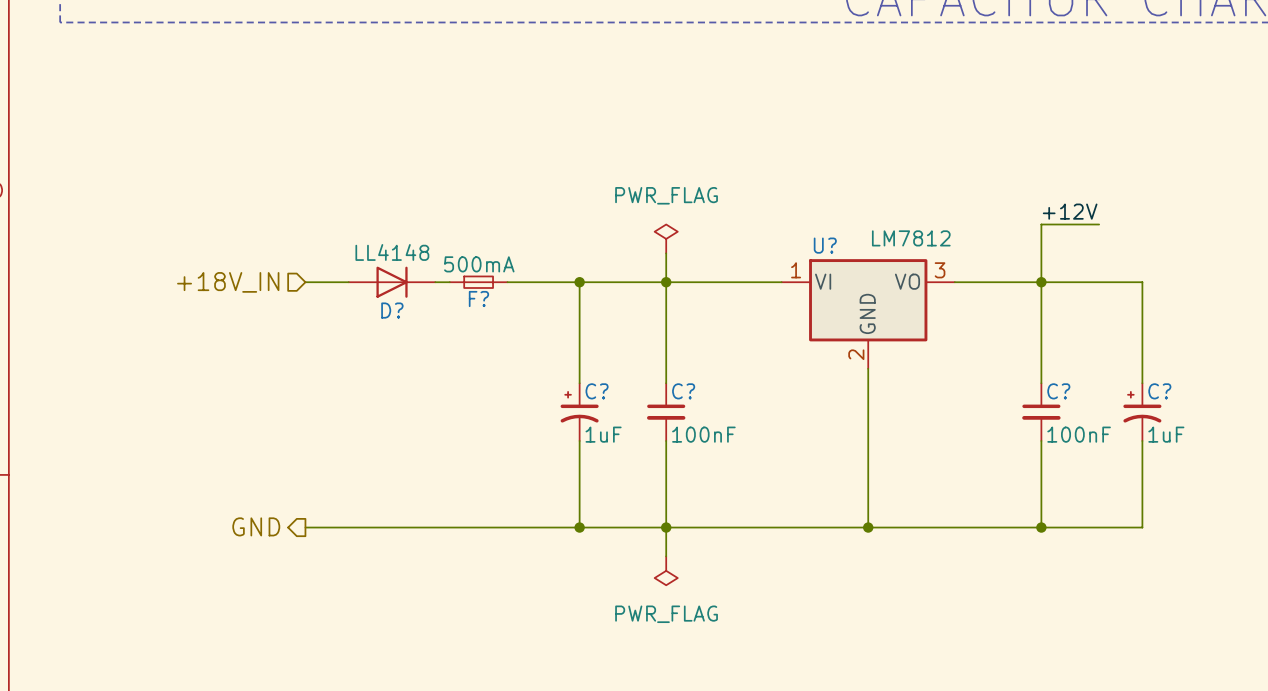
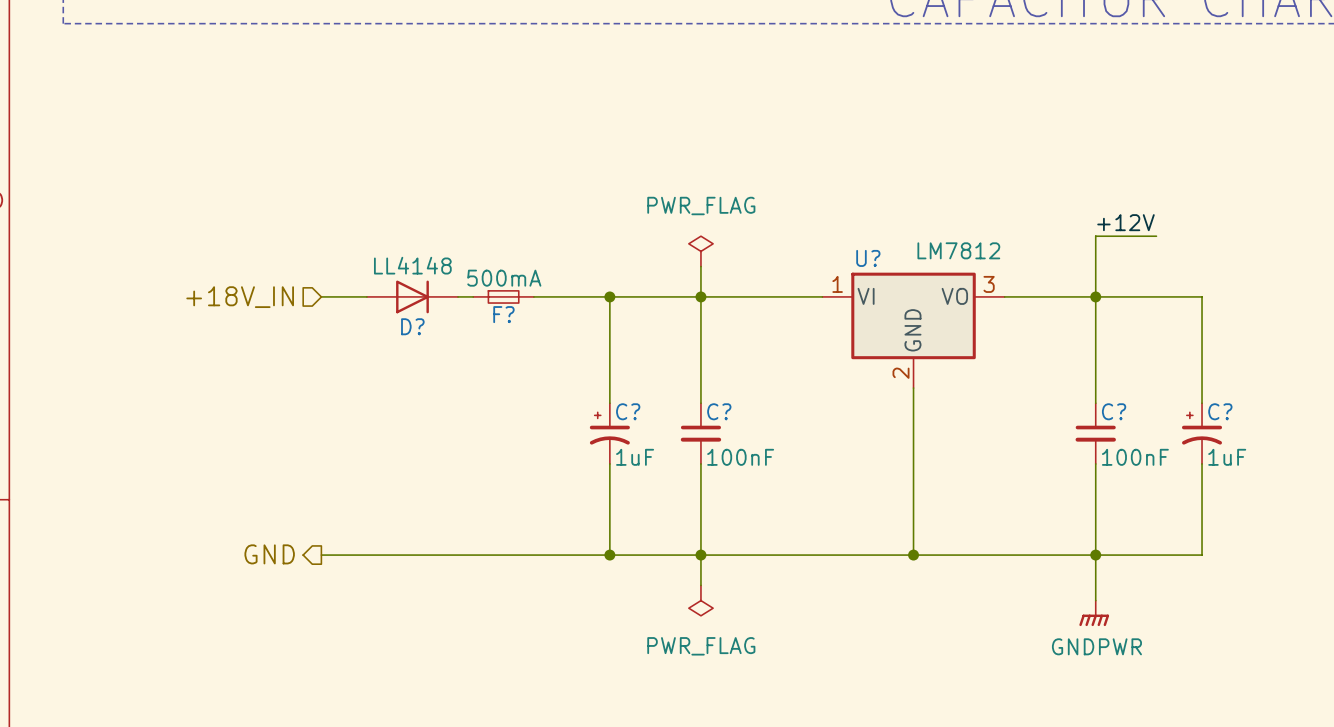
wire: none -> (1095, 555) (1095, 600)
power symbol: none -> GNDPWR (1094, 613)

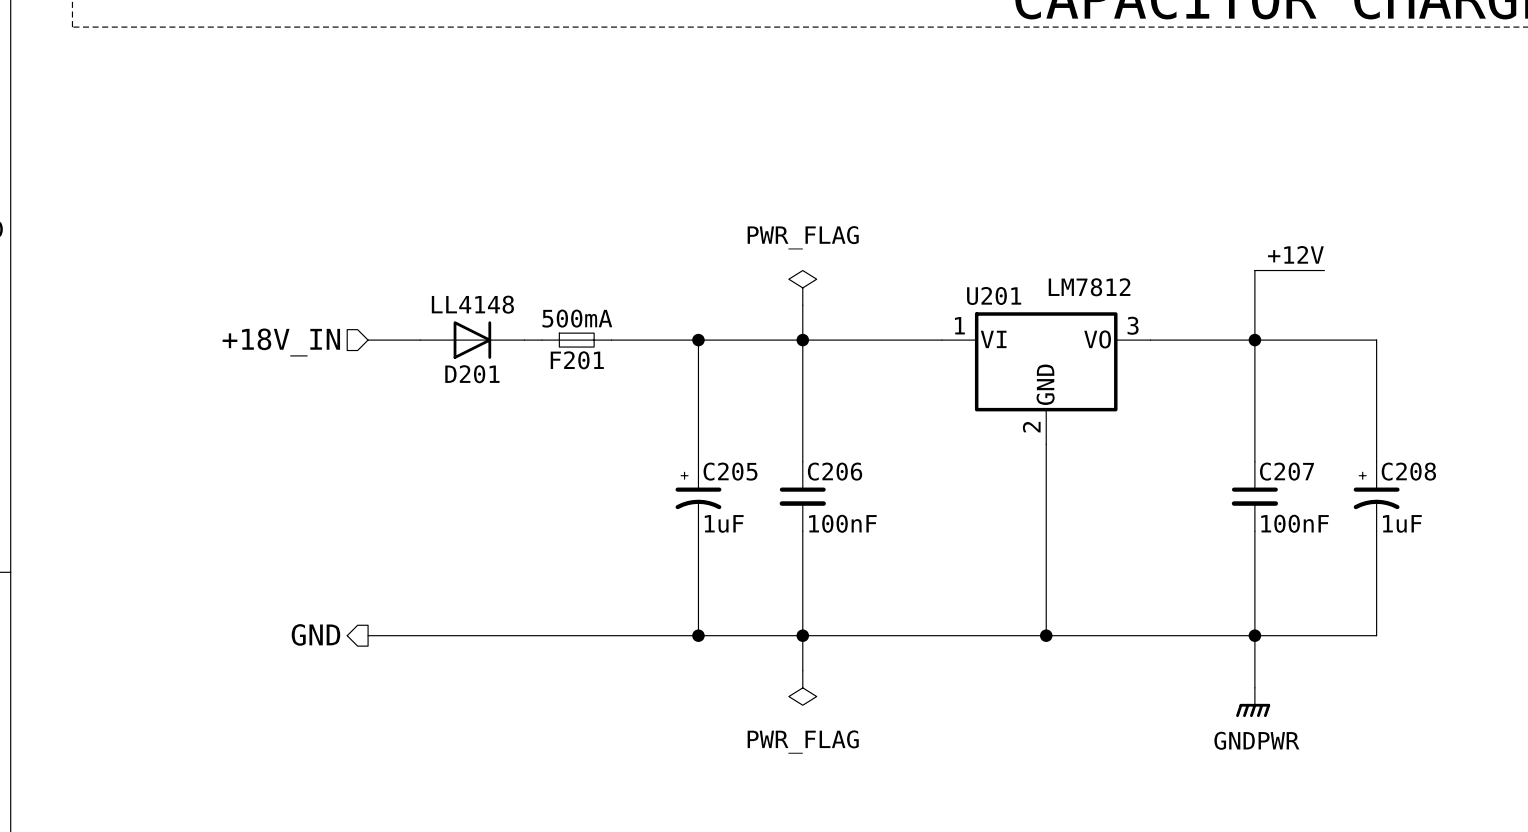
U? name: U? (868, 258) -> U201 (994, 295)
F? name: F? (503, 314) -> F201 (577, 360)
D? name: D? (412, 326) -> D201 (472, 374)
C? name: C? (628, 411) -> C205 (730, 471)
C? name: C? (719, 411) -> C206 (835, 471)
C? name: C? (1114, 411) -> C207 (1287, 471)
C? name: C? (1220, 411) -> C208 (1408, 471)

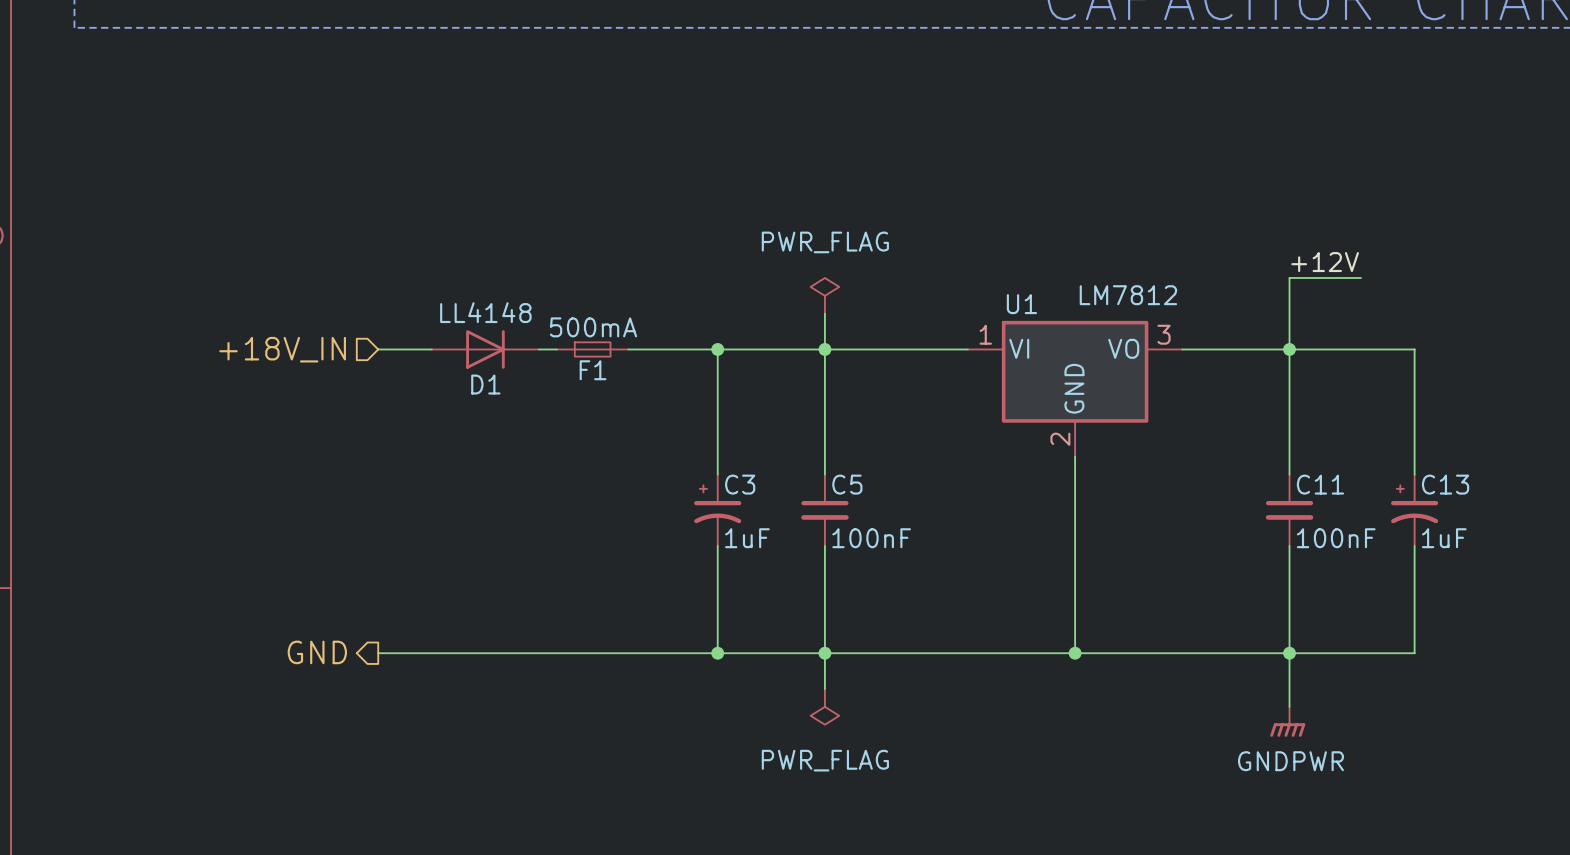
U201 name: U201 (994, 295) -> U1 (1021, 304)
F201 name: F201 (577, 360) -> F1 (593, 370)
D201 name: D201 (472, 374) -> D1 (485, 384)
C205 name: C205 (730, 471) -> C3 (740, 484)
C206 name: C206 (835, 471) -> C5 (847, 484)
C207 name: C207 (1287, 471) -> C11 (1320, 484)
C208 name: C208 (1408, 471) -> C13 (1445, 484)

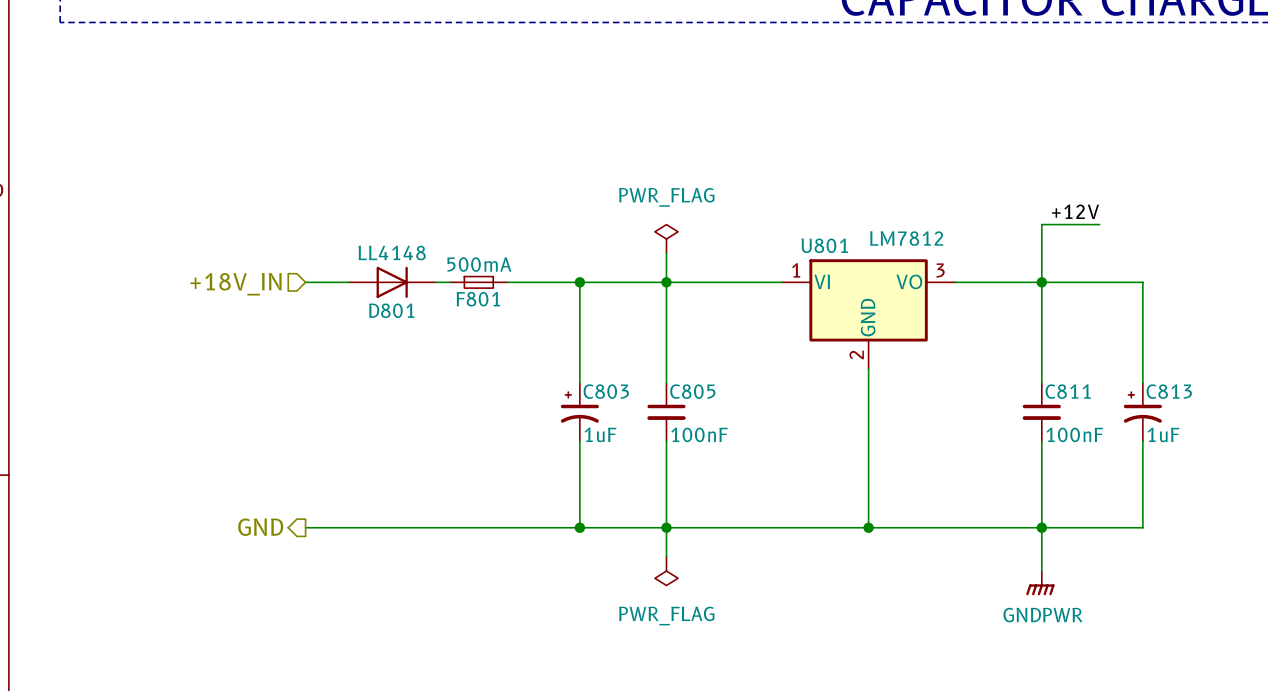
U1 name: U1 (1021, 304) -> U801 (824, 245)
F1 name: F1 (593, 370) -> F801 (478, 299)
D1 name: D1 (485, 384) -> D801 (391, 310)
C3 name: C3 (740, 484) -> C803 (606, 391)
C5 name: C5 (847, 484) -> C805 (692, 391)
C11 name: C11 (1320, 484) -> C811 (1068, 391)
C13 name: C13 (1445, 484) -> C813 (1169, 391)

